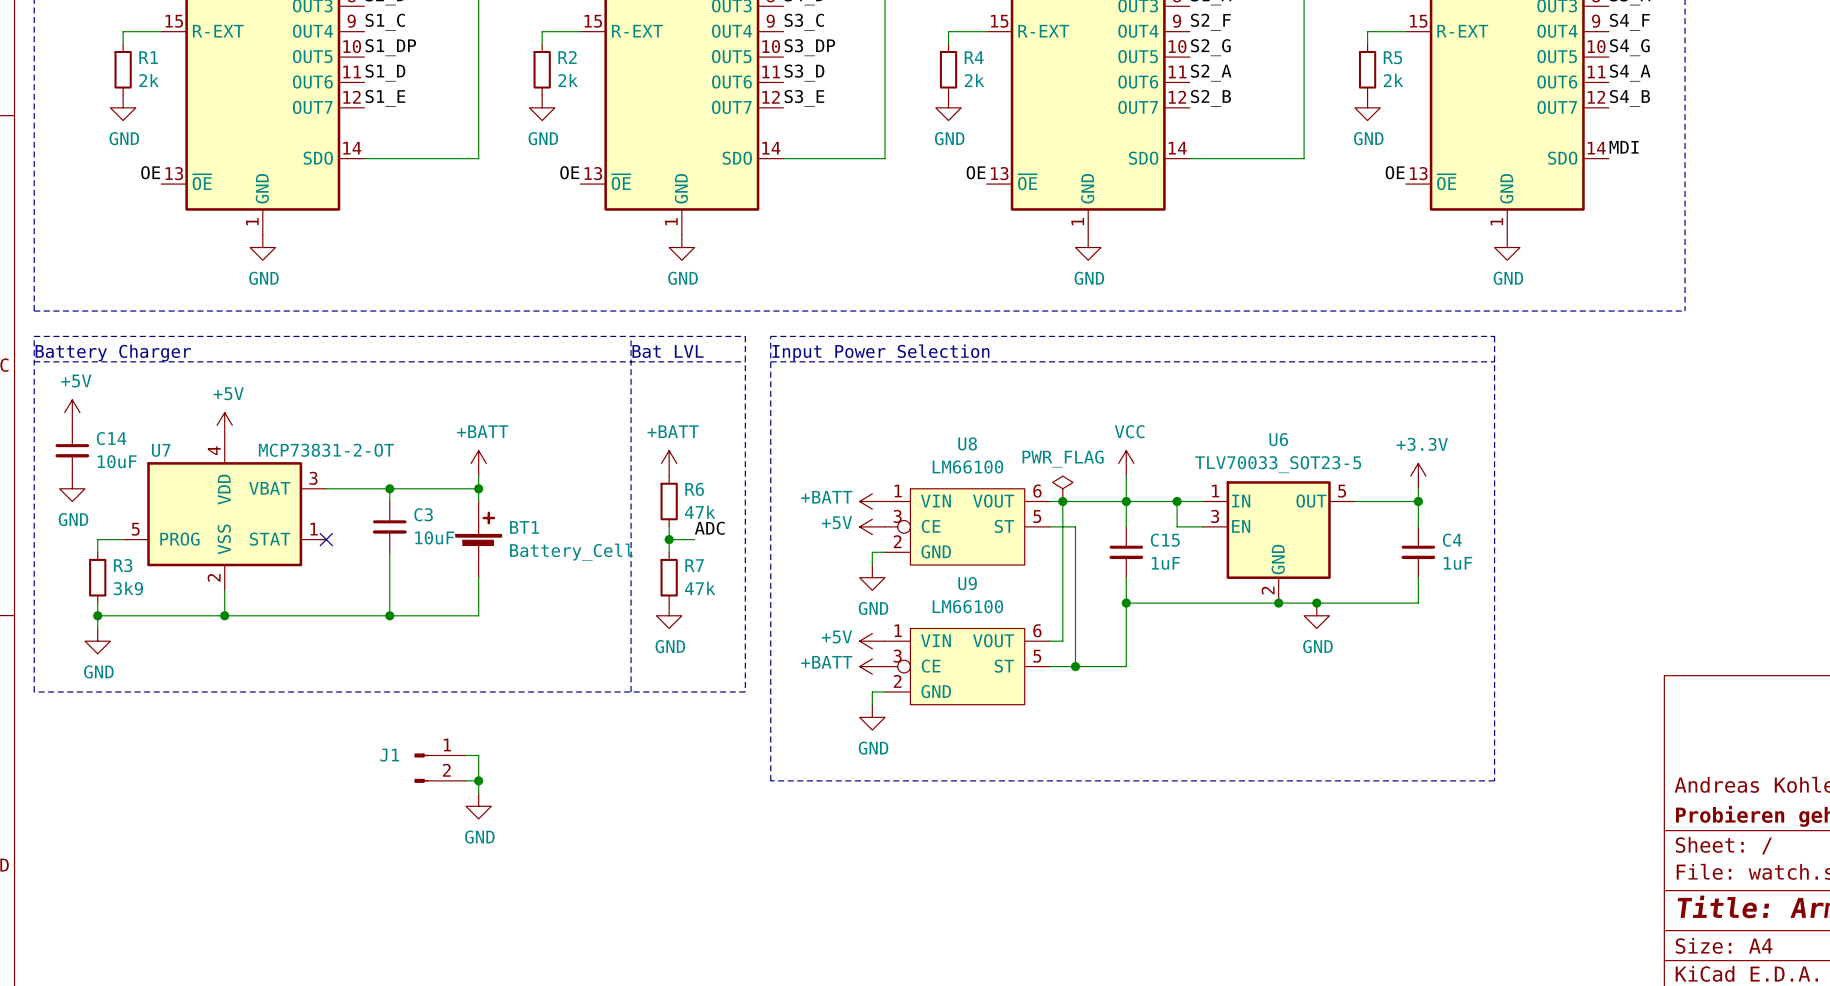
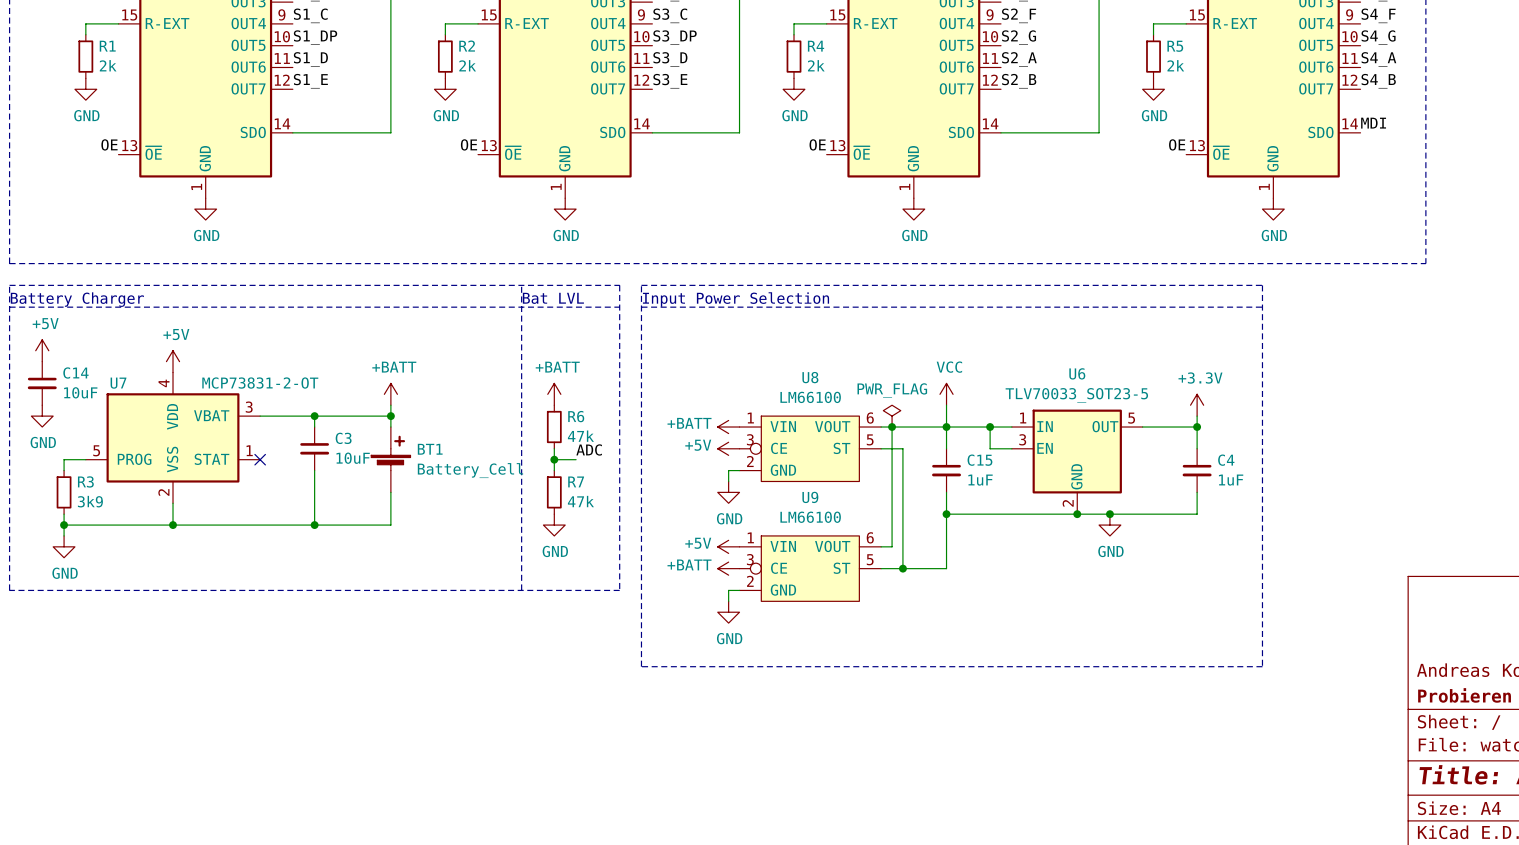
wire: (465, 755) (478, 755) (478, 793) -> none
J1: (440, 768) -> none
wire: (465, 780) (478, 780) -> none
junction: (478, 780) -> none
power symbol: GND (478, 806) -> none

